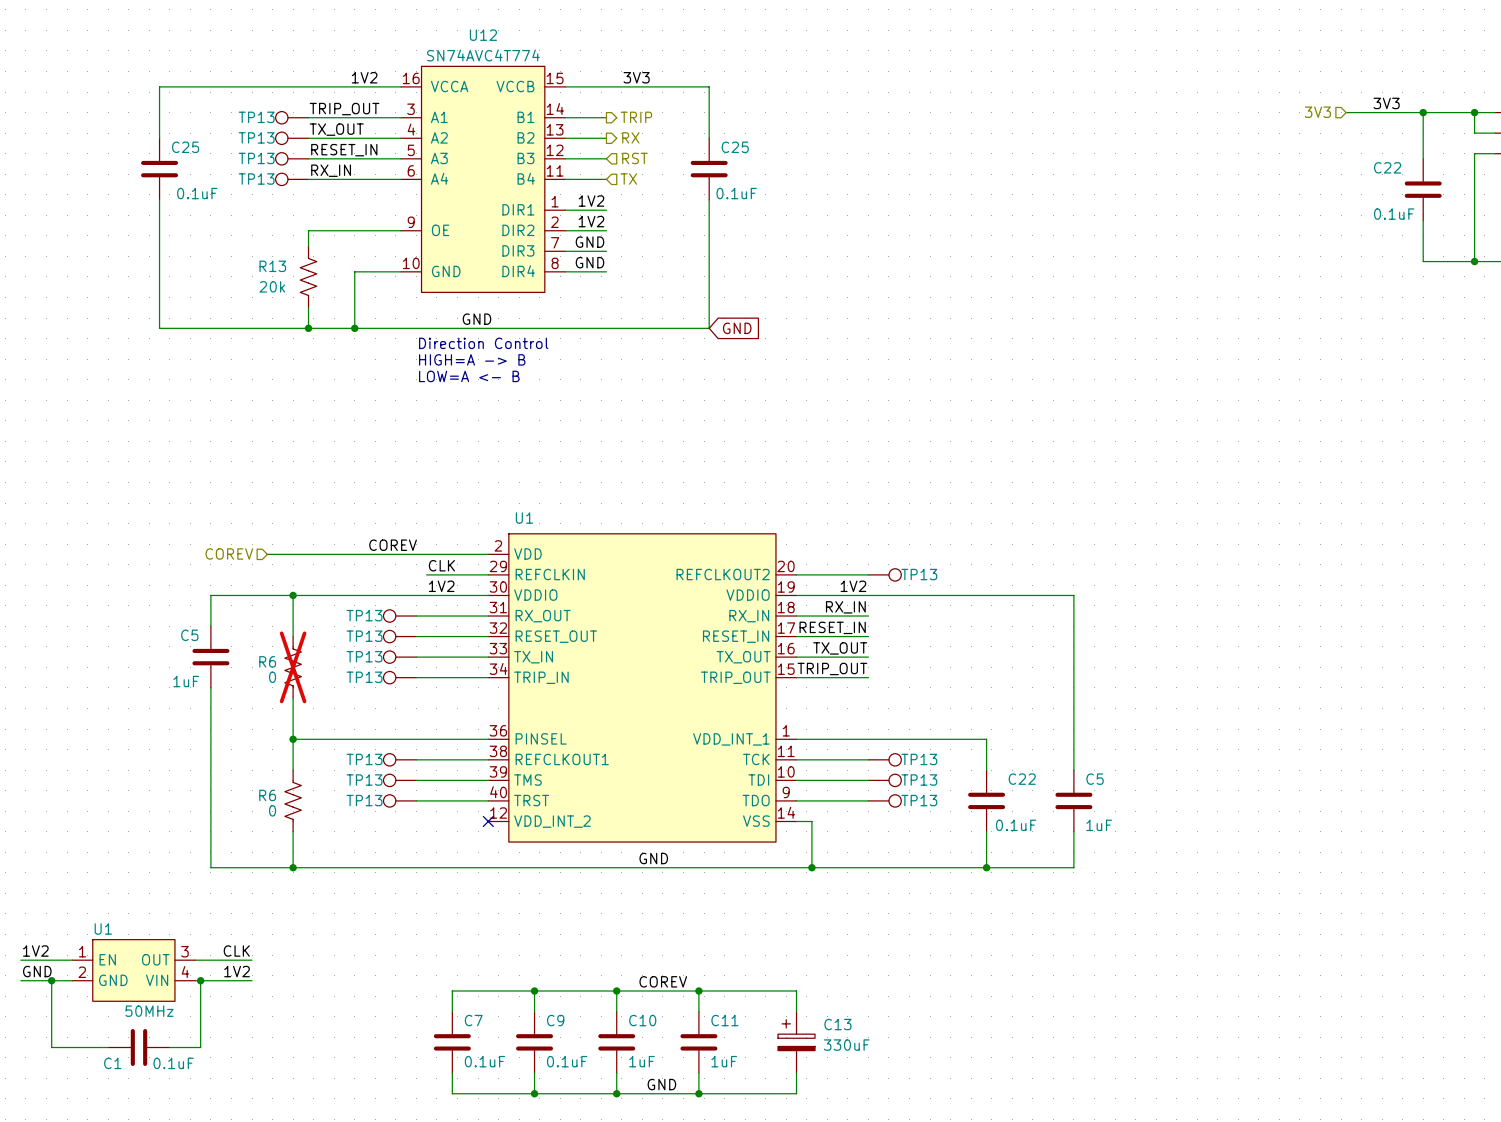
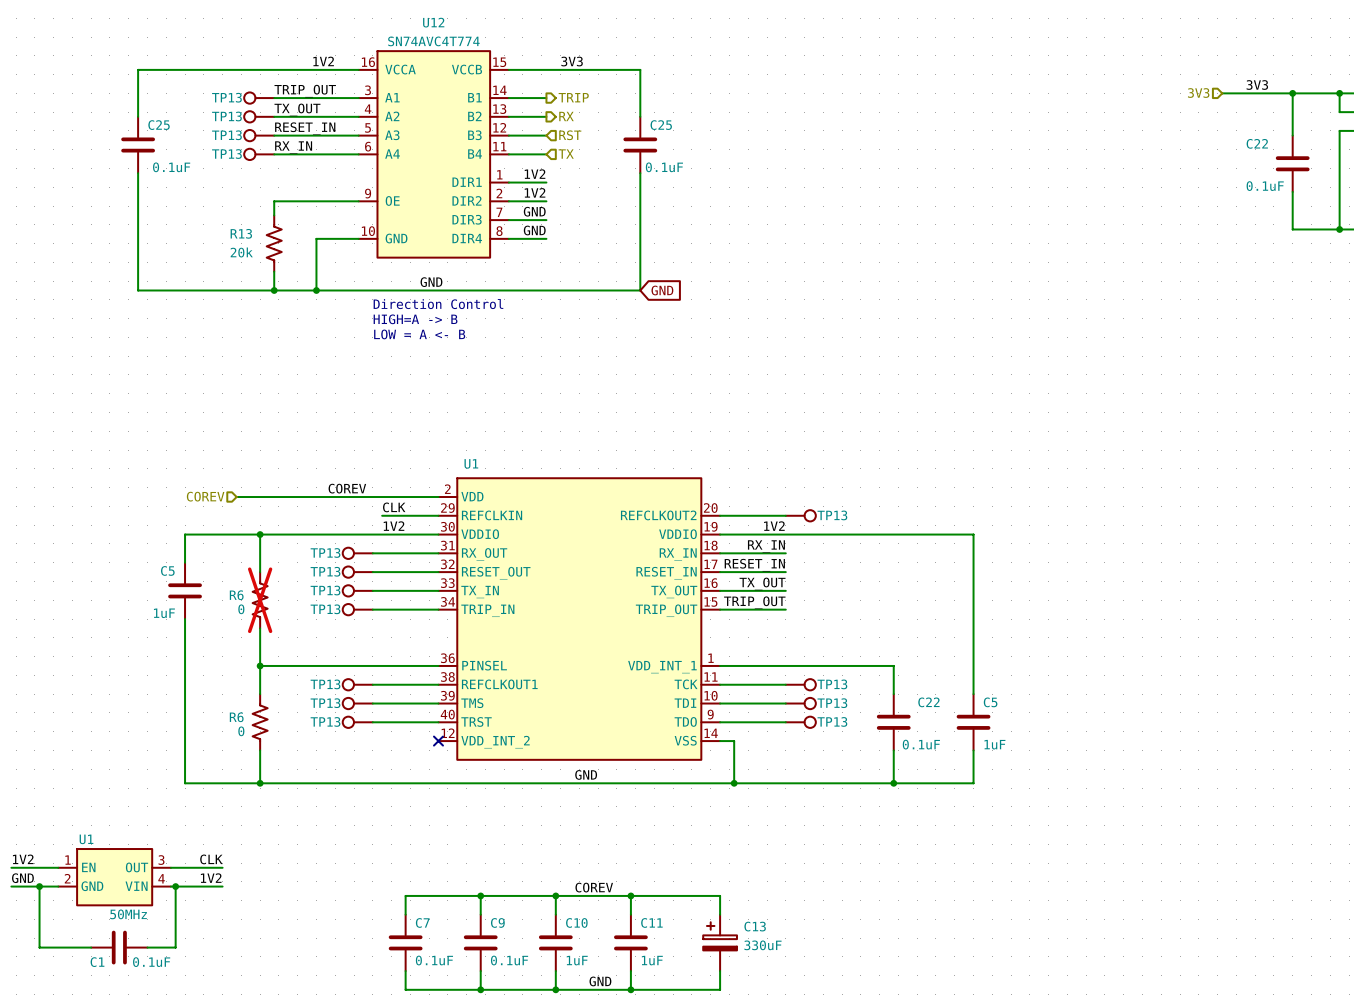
text: LOW=A <- B (469, 376) -> LOW = A <- B (419, 334)

